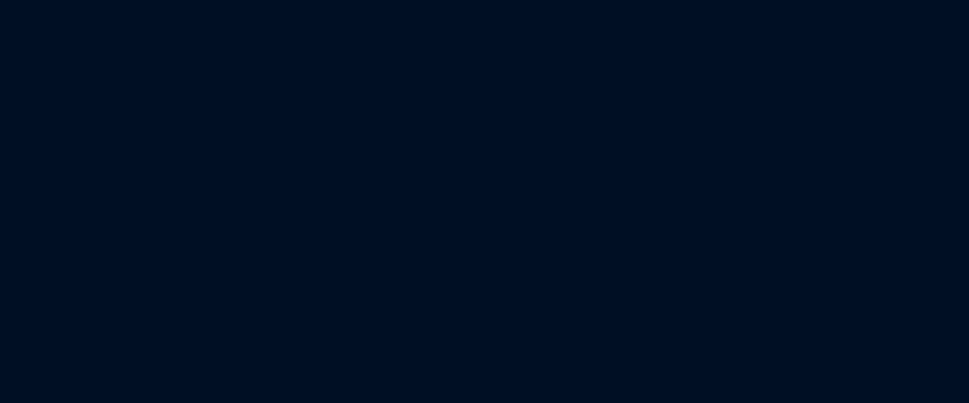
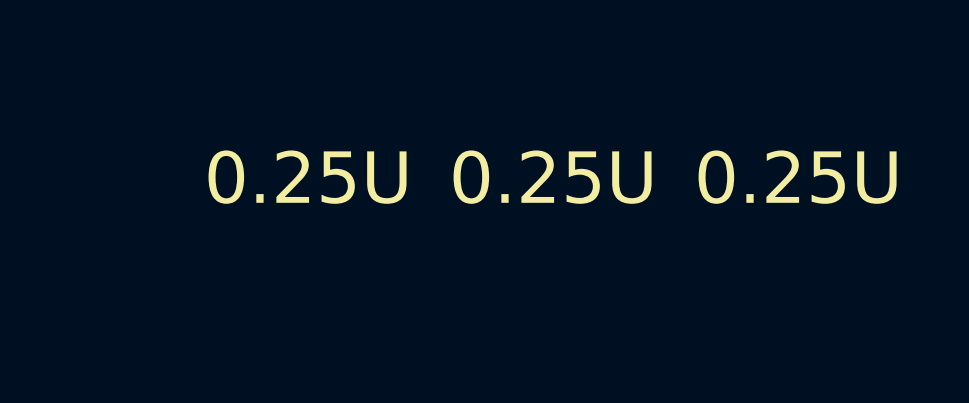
0.25U: none -> (307, 177)
0.25U: none -> (552, 177)
0.25U: none -> (797, 177)

